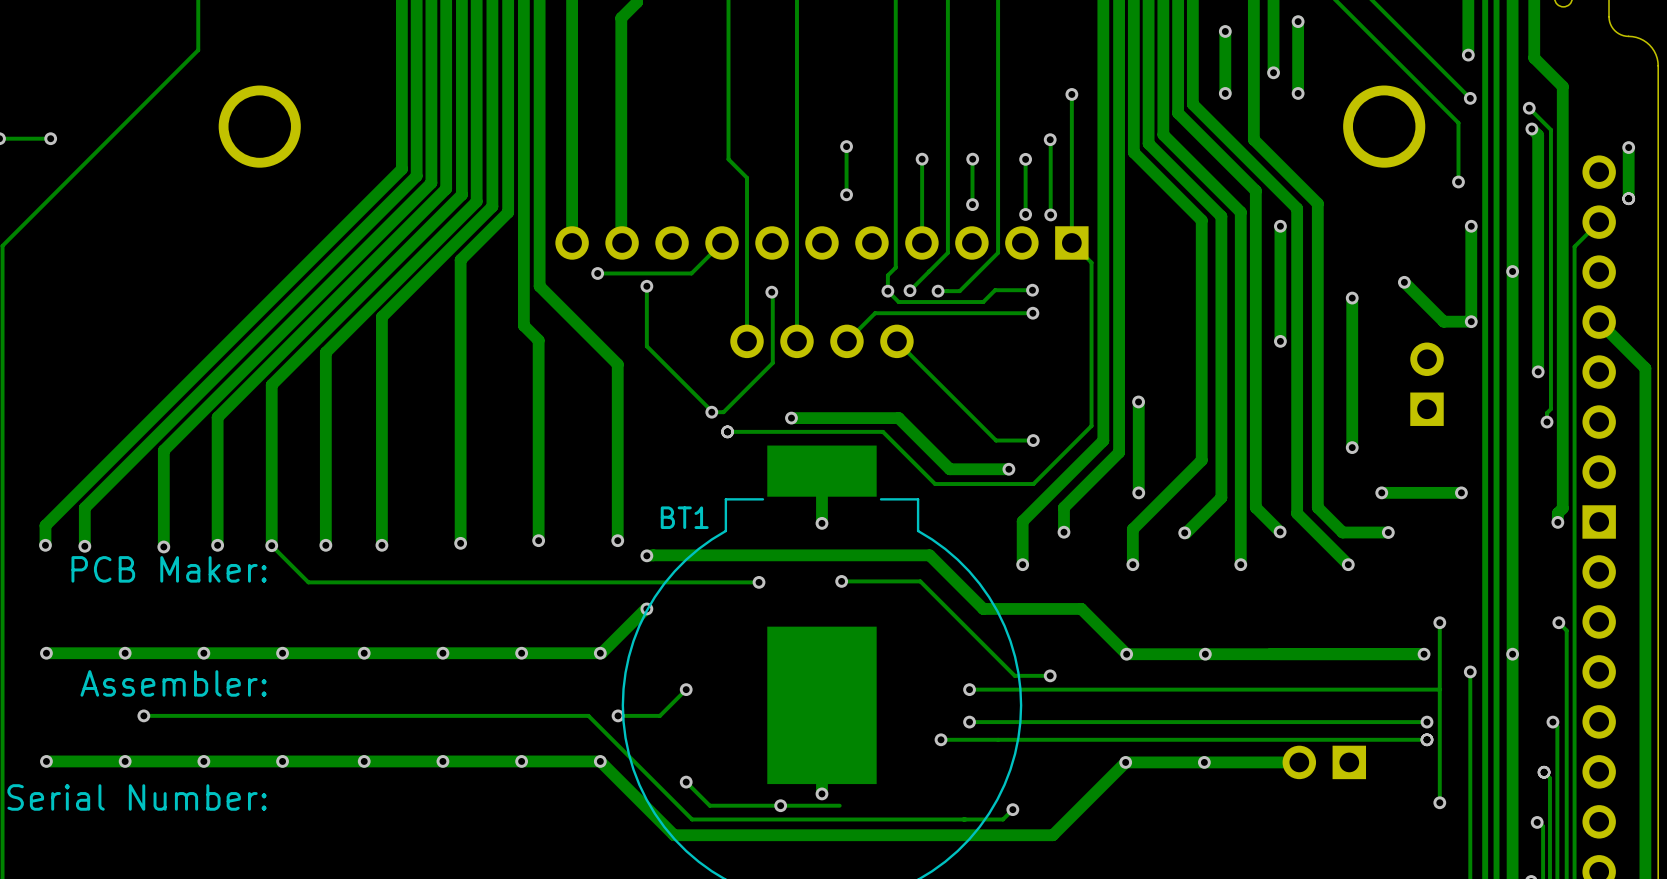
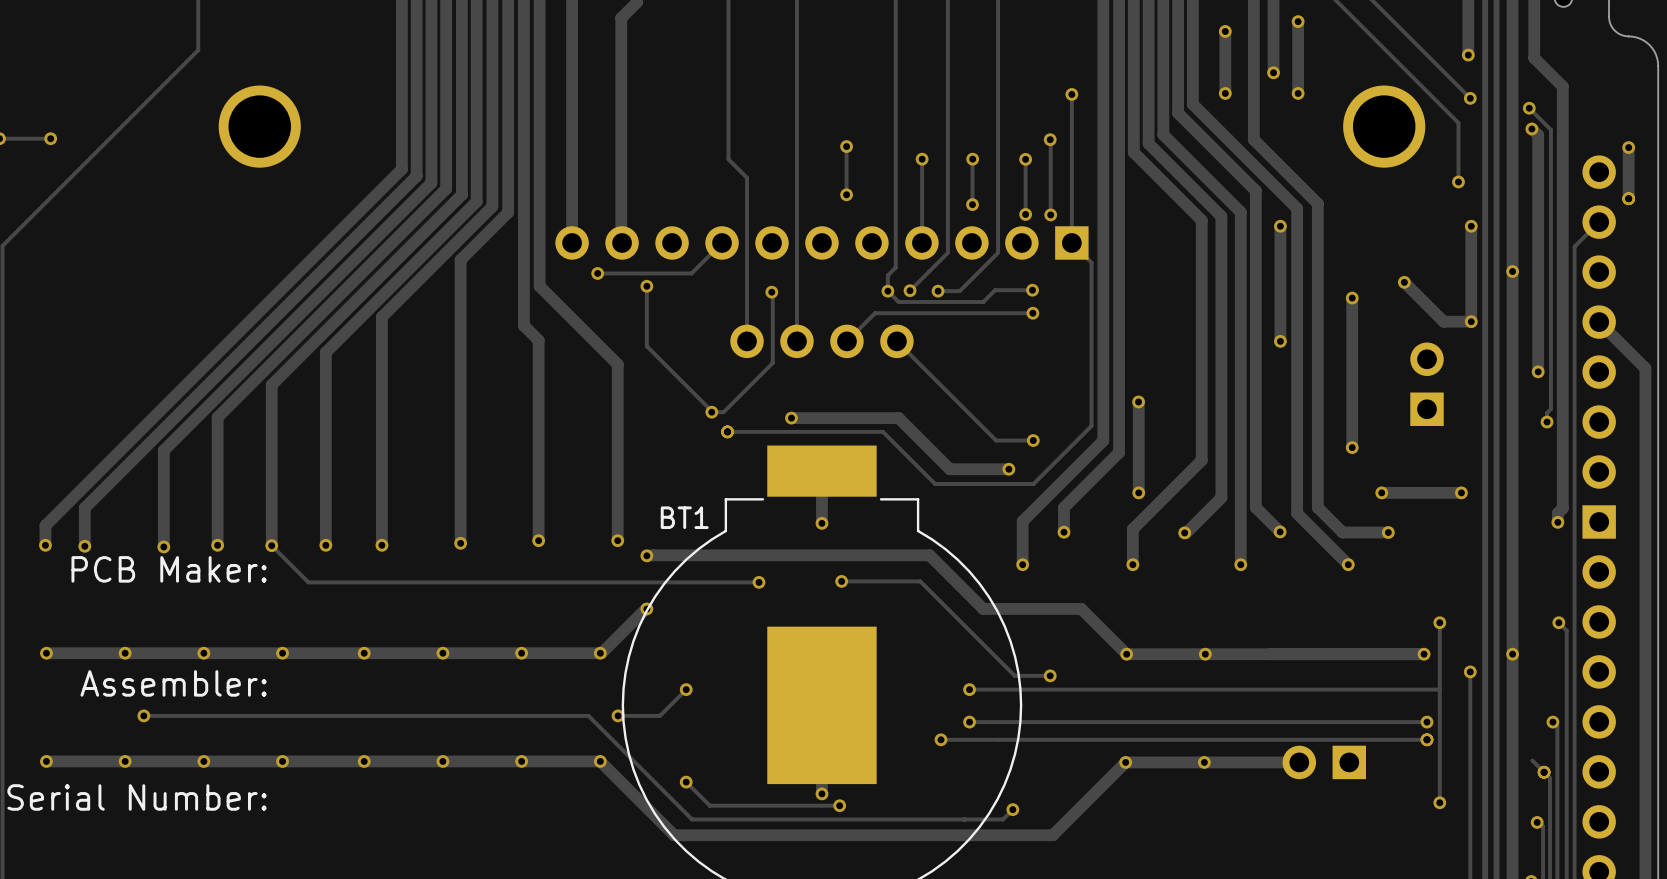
track: none -> (1532, 760) (1544, 772)
via position: (780, 805) -> (839, 805)

